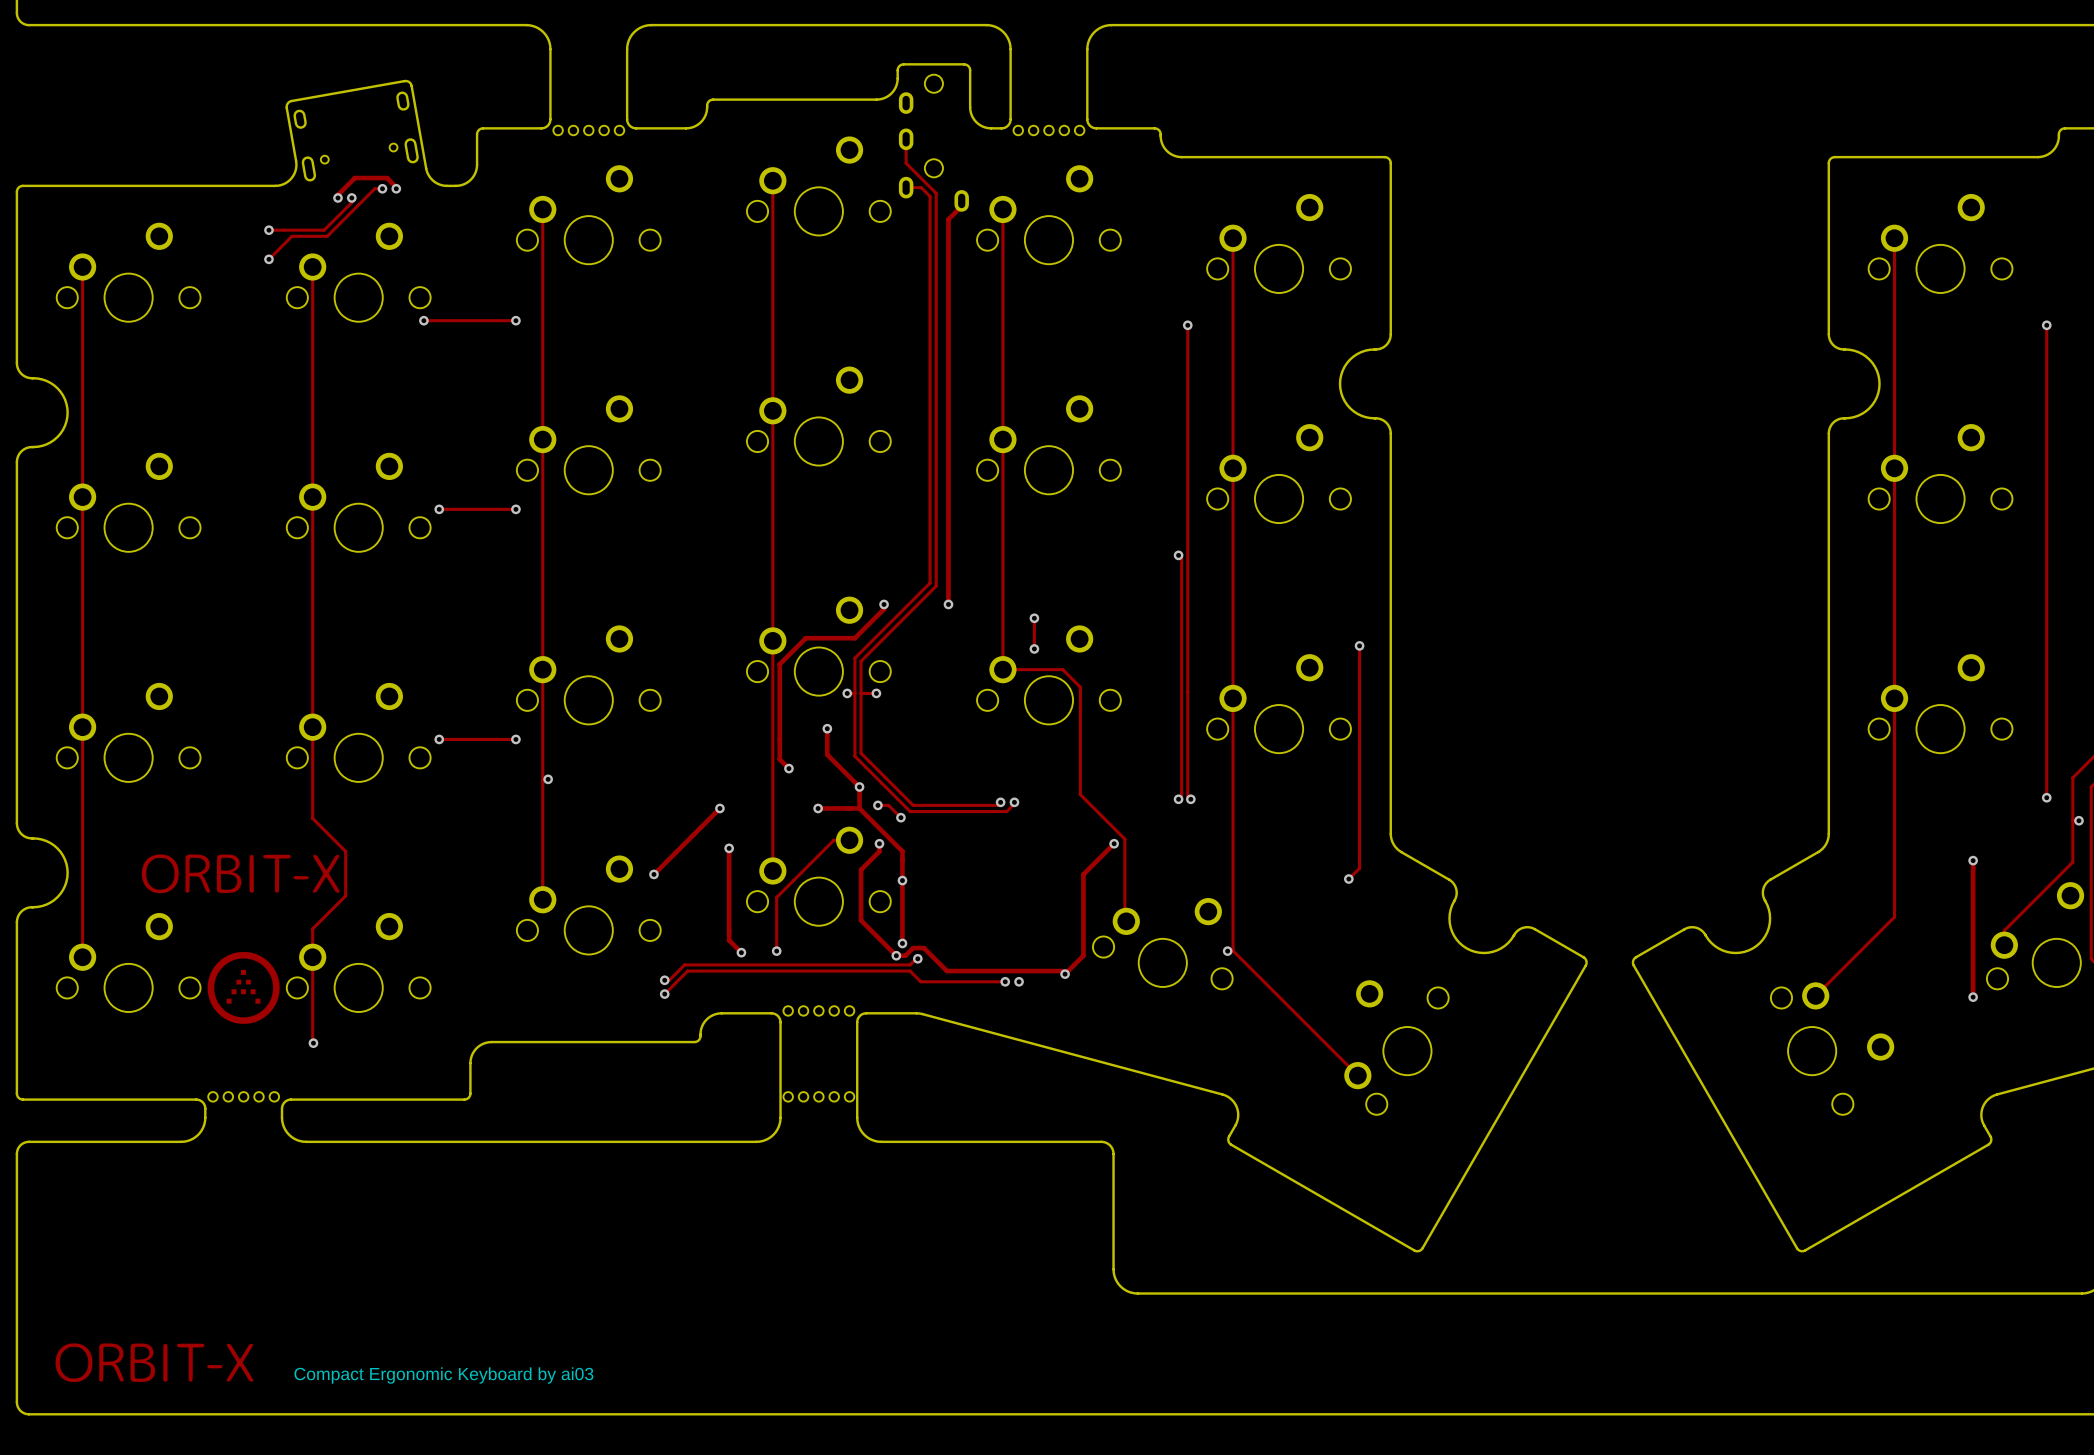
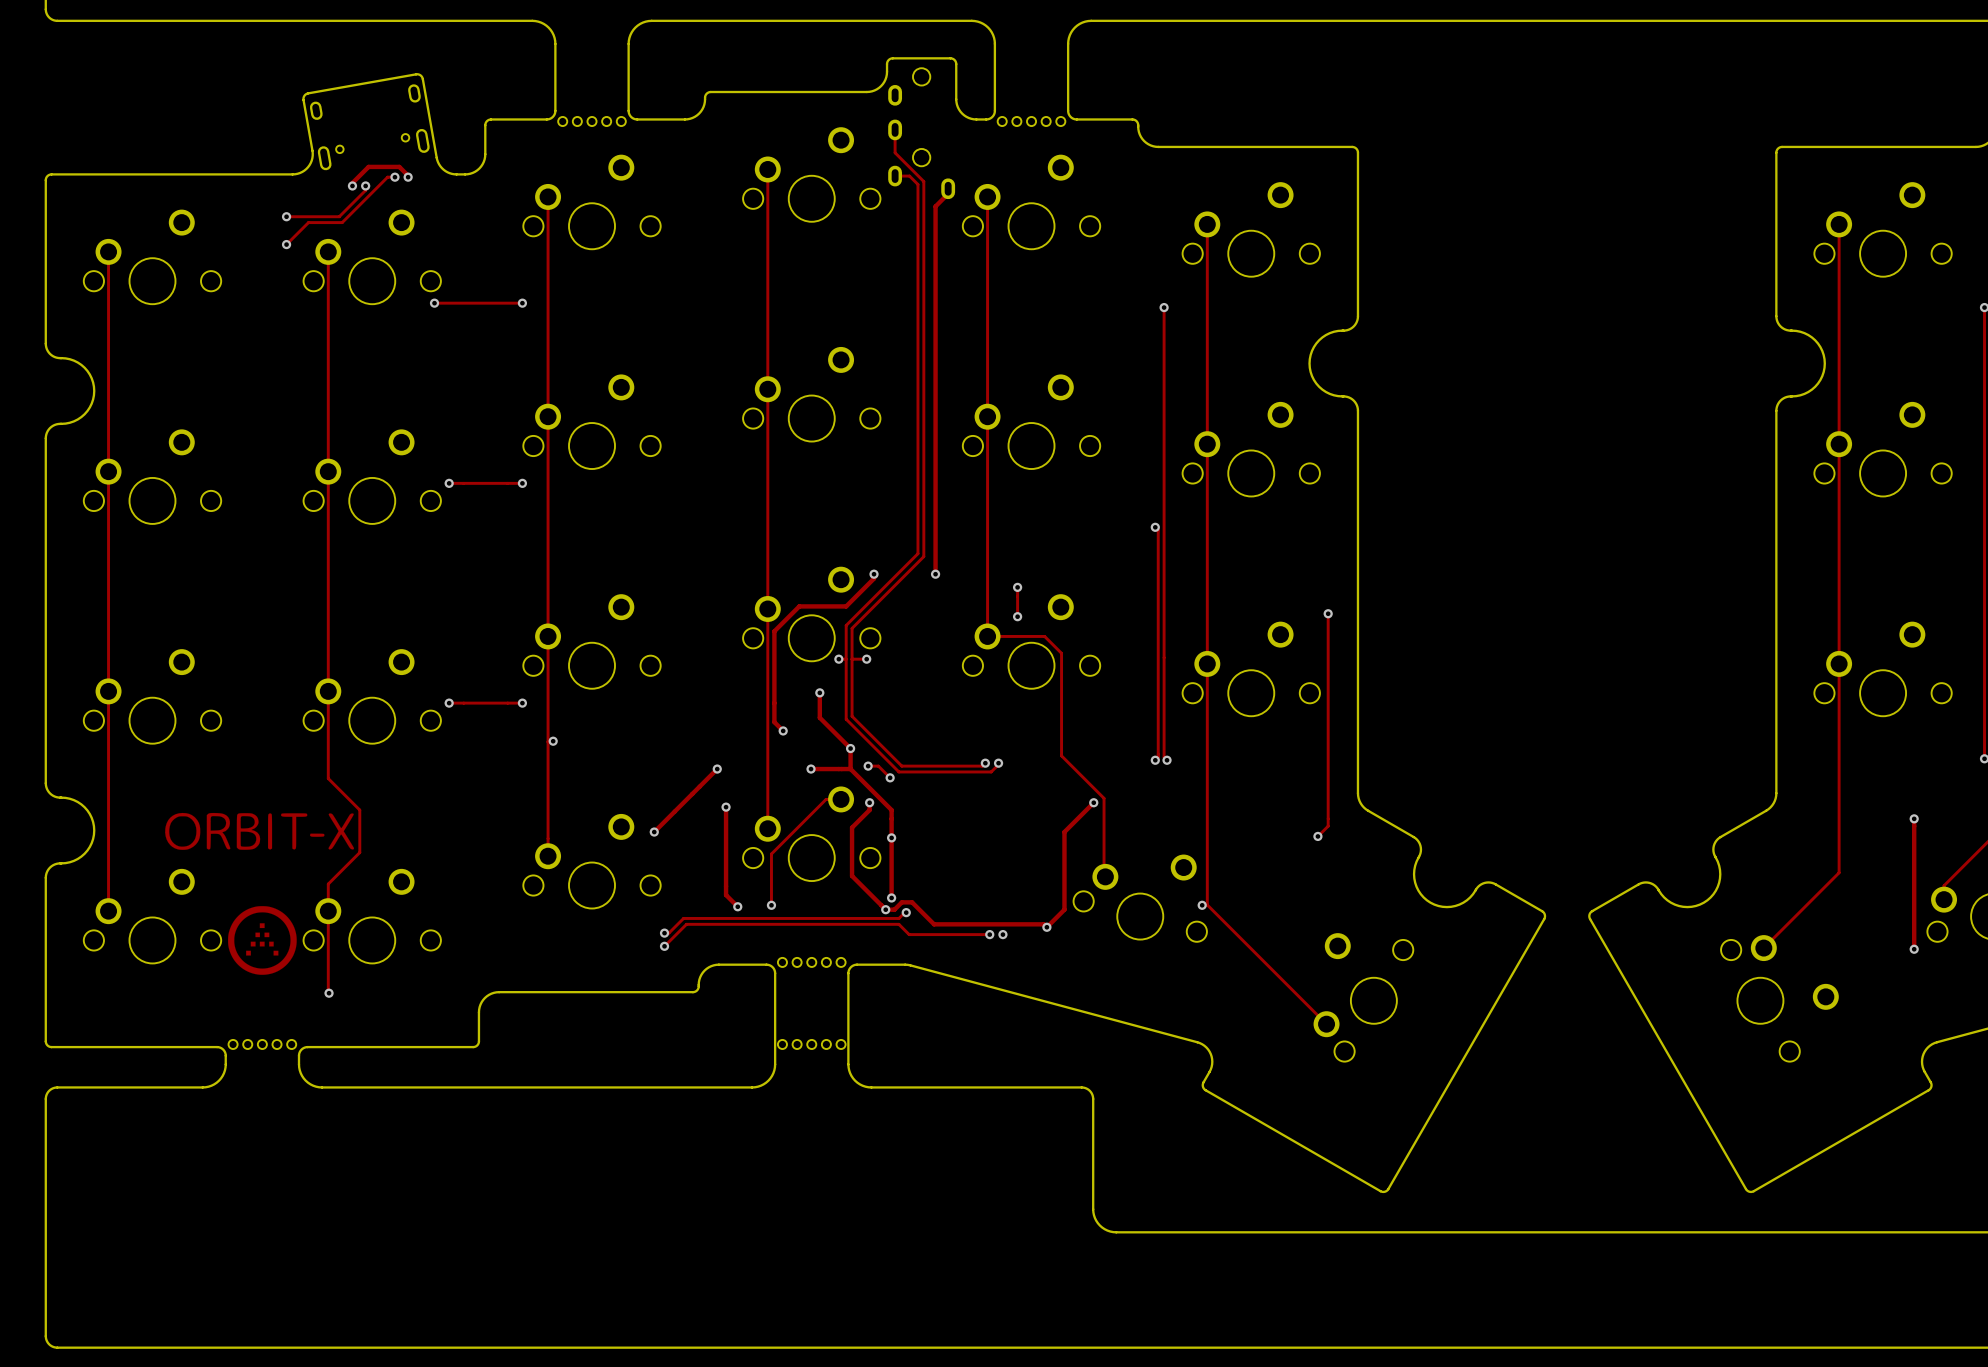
drawing: [55, 1343, 254, 1383] -> none
text: Compact Ergonomic Keyboard by ai03 (443, 1375) -> none

